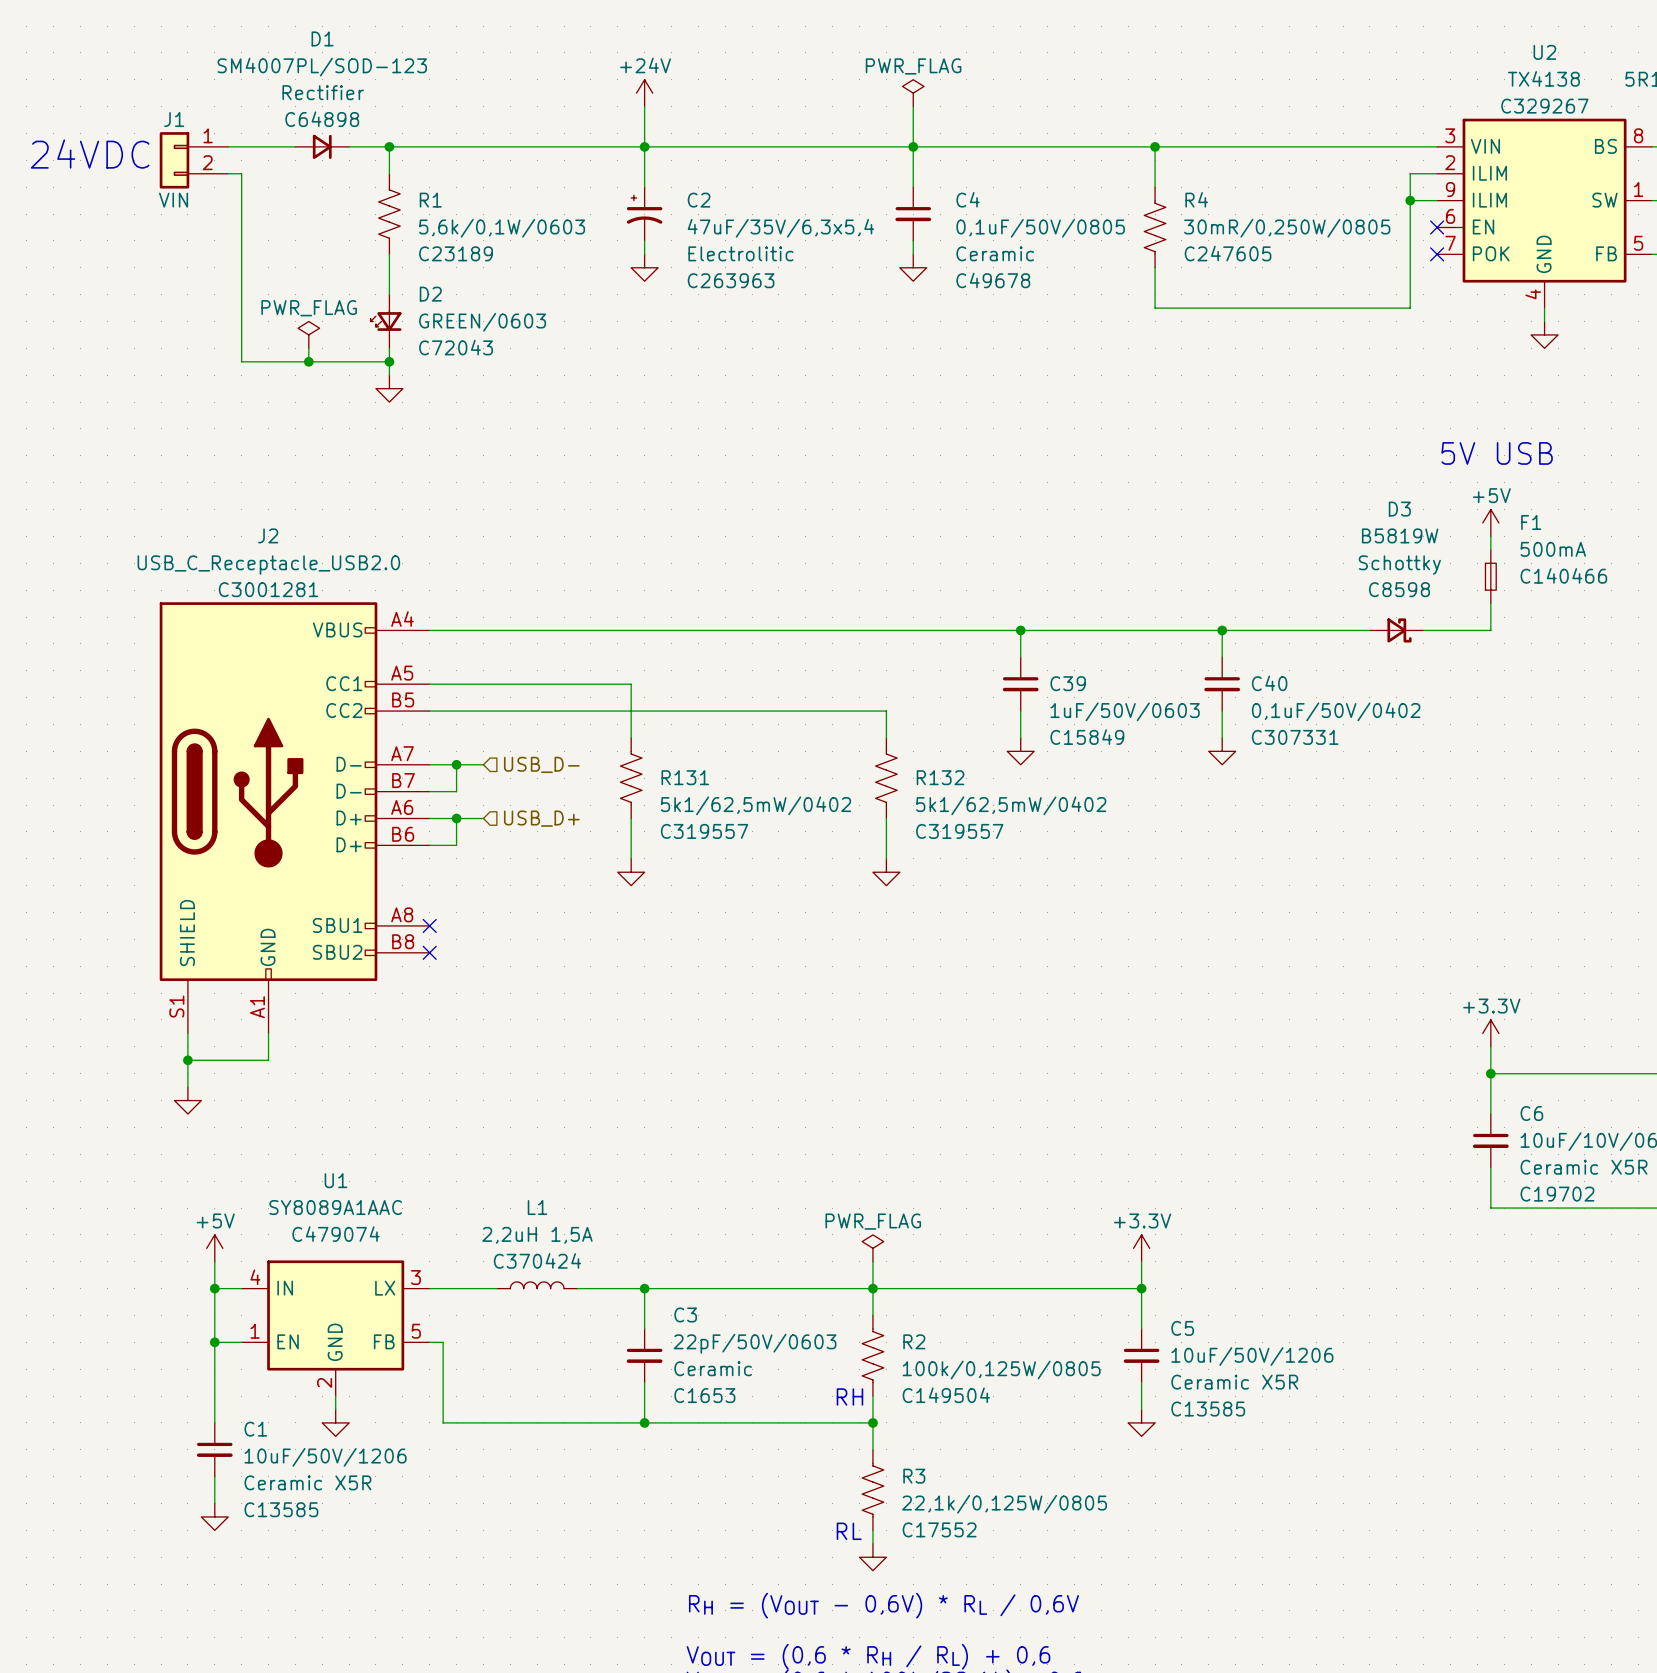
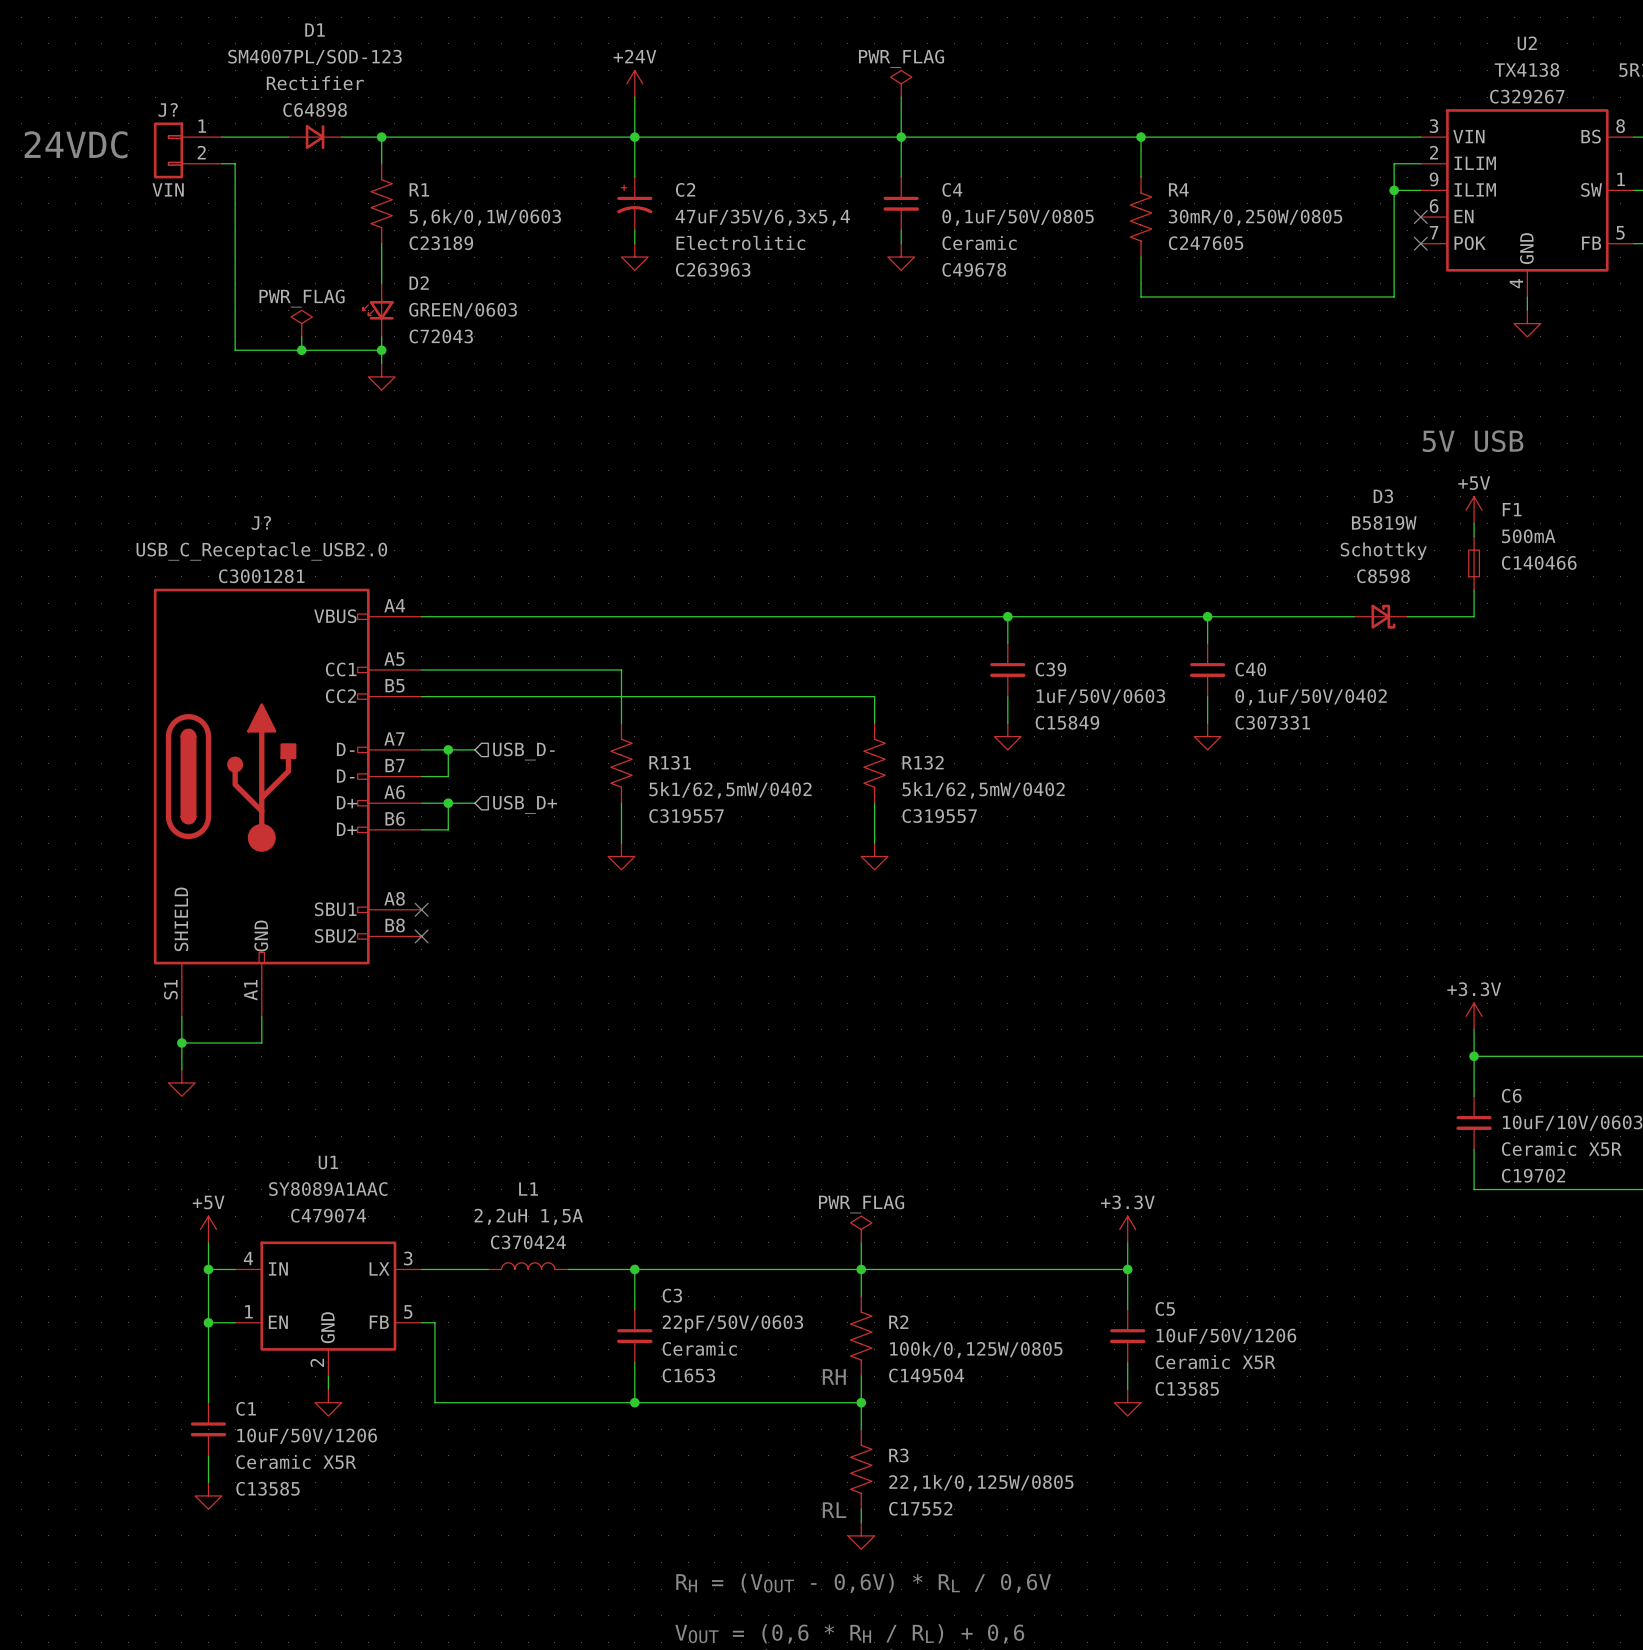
J1 name: J1 (174, 119) -> J? (168, 109)
J2 name: J2 (268, 535) -> J? (261, 522)

